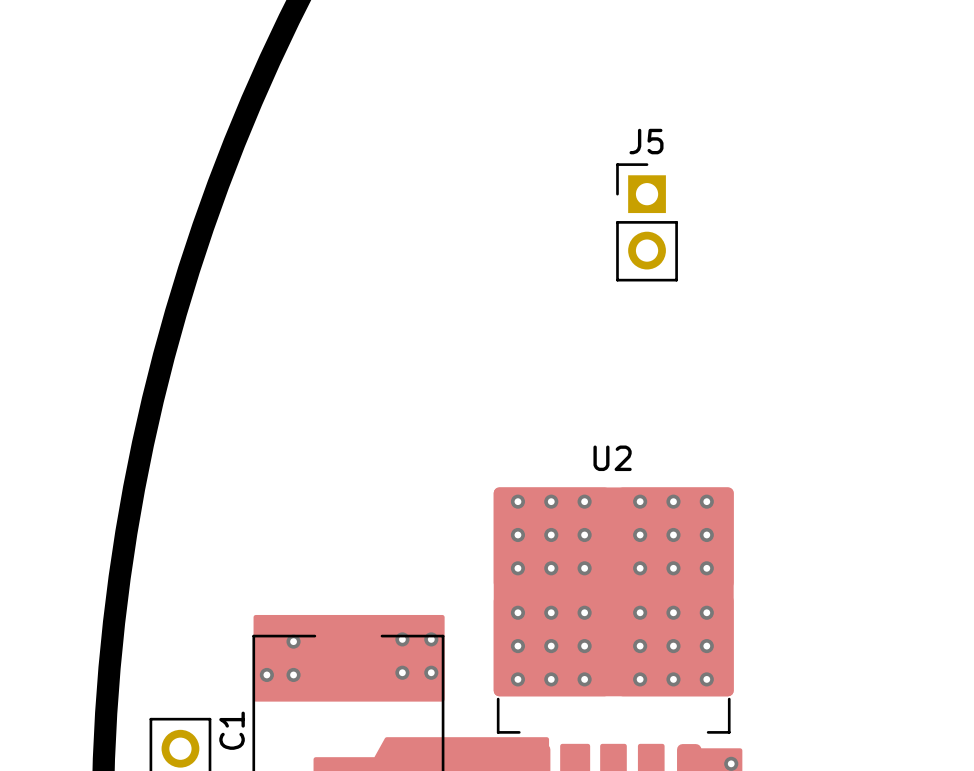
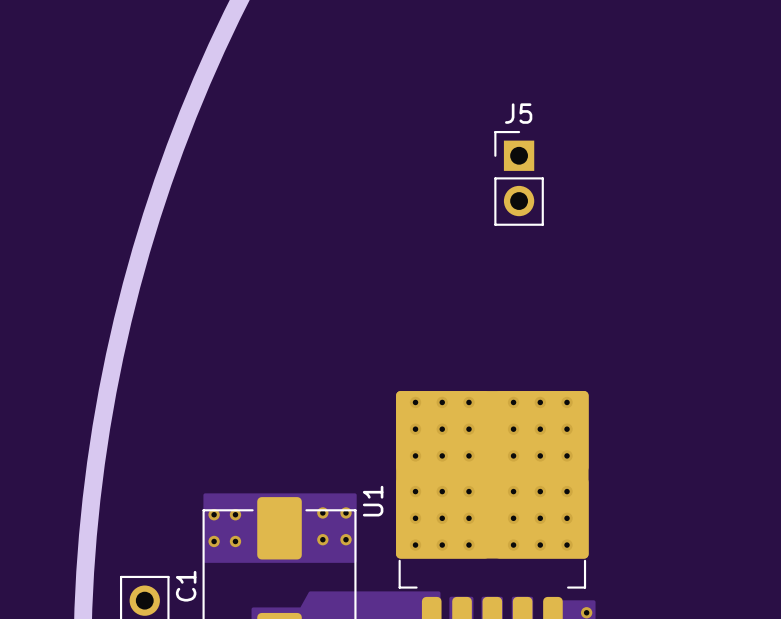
U2 name: U2 (612, 458) -> U1 (373, 501)
via: none -> (214, 514)

